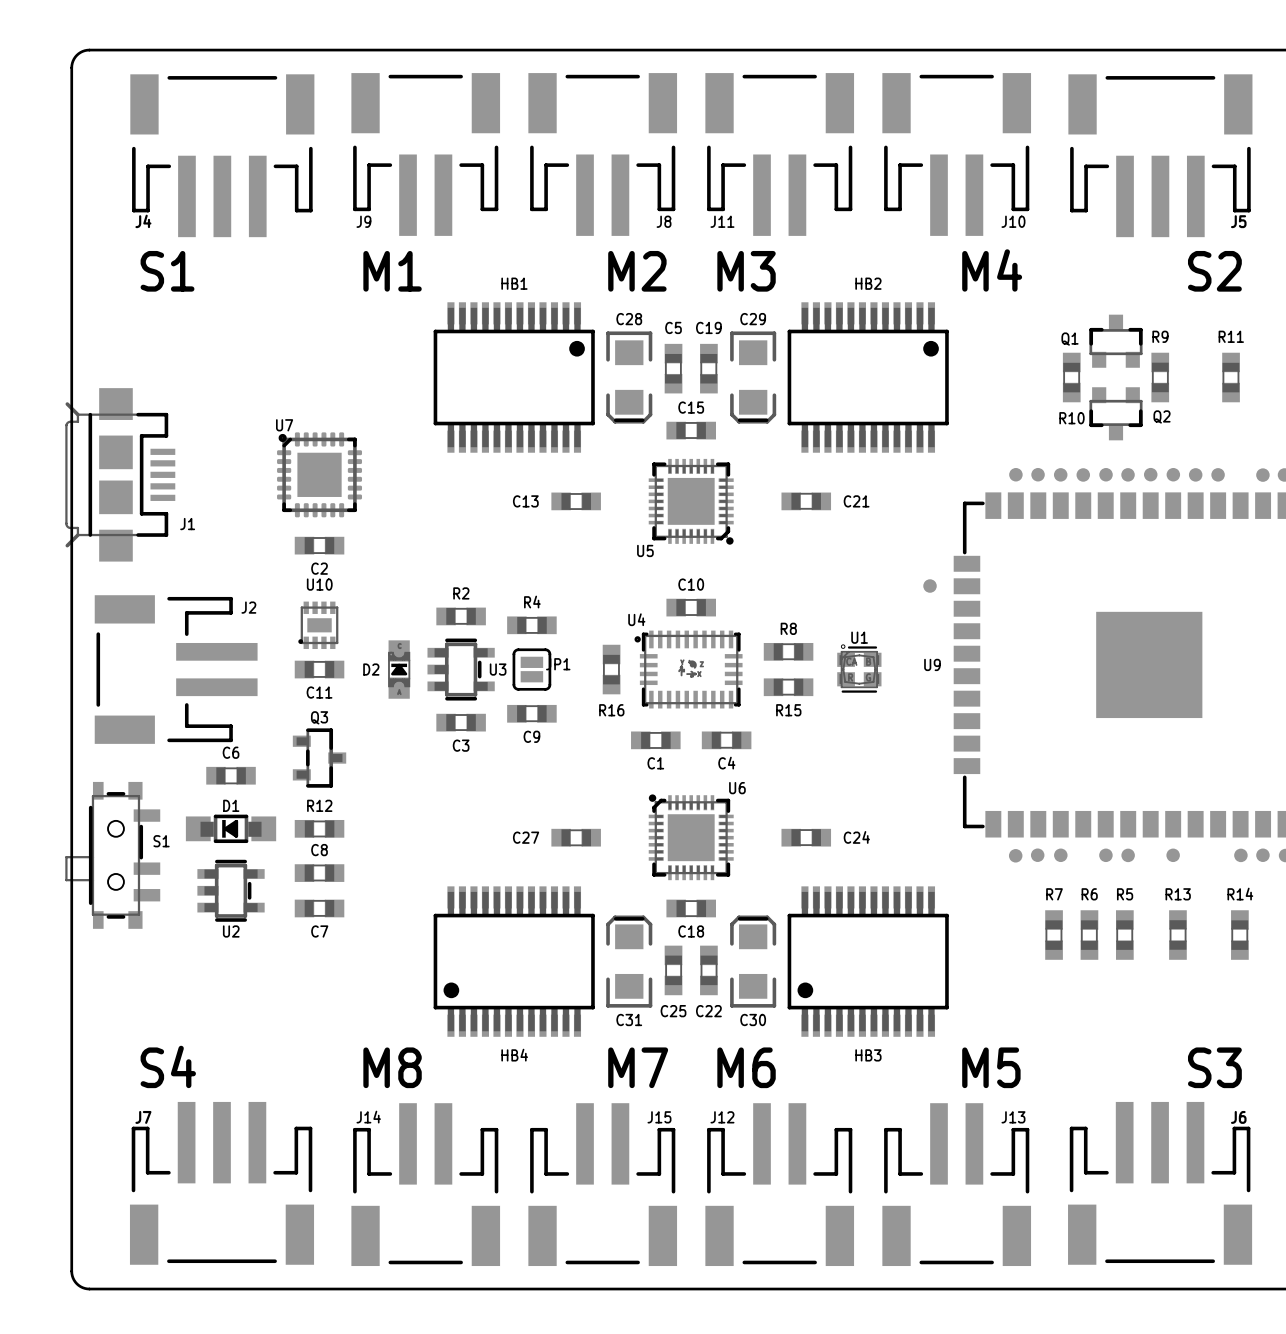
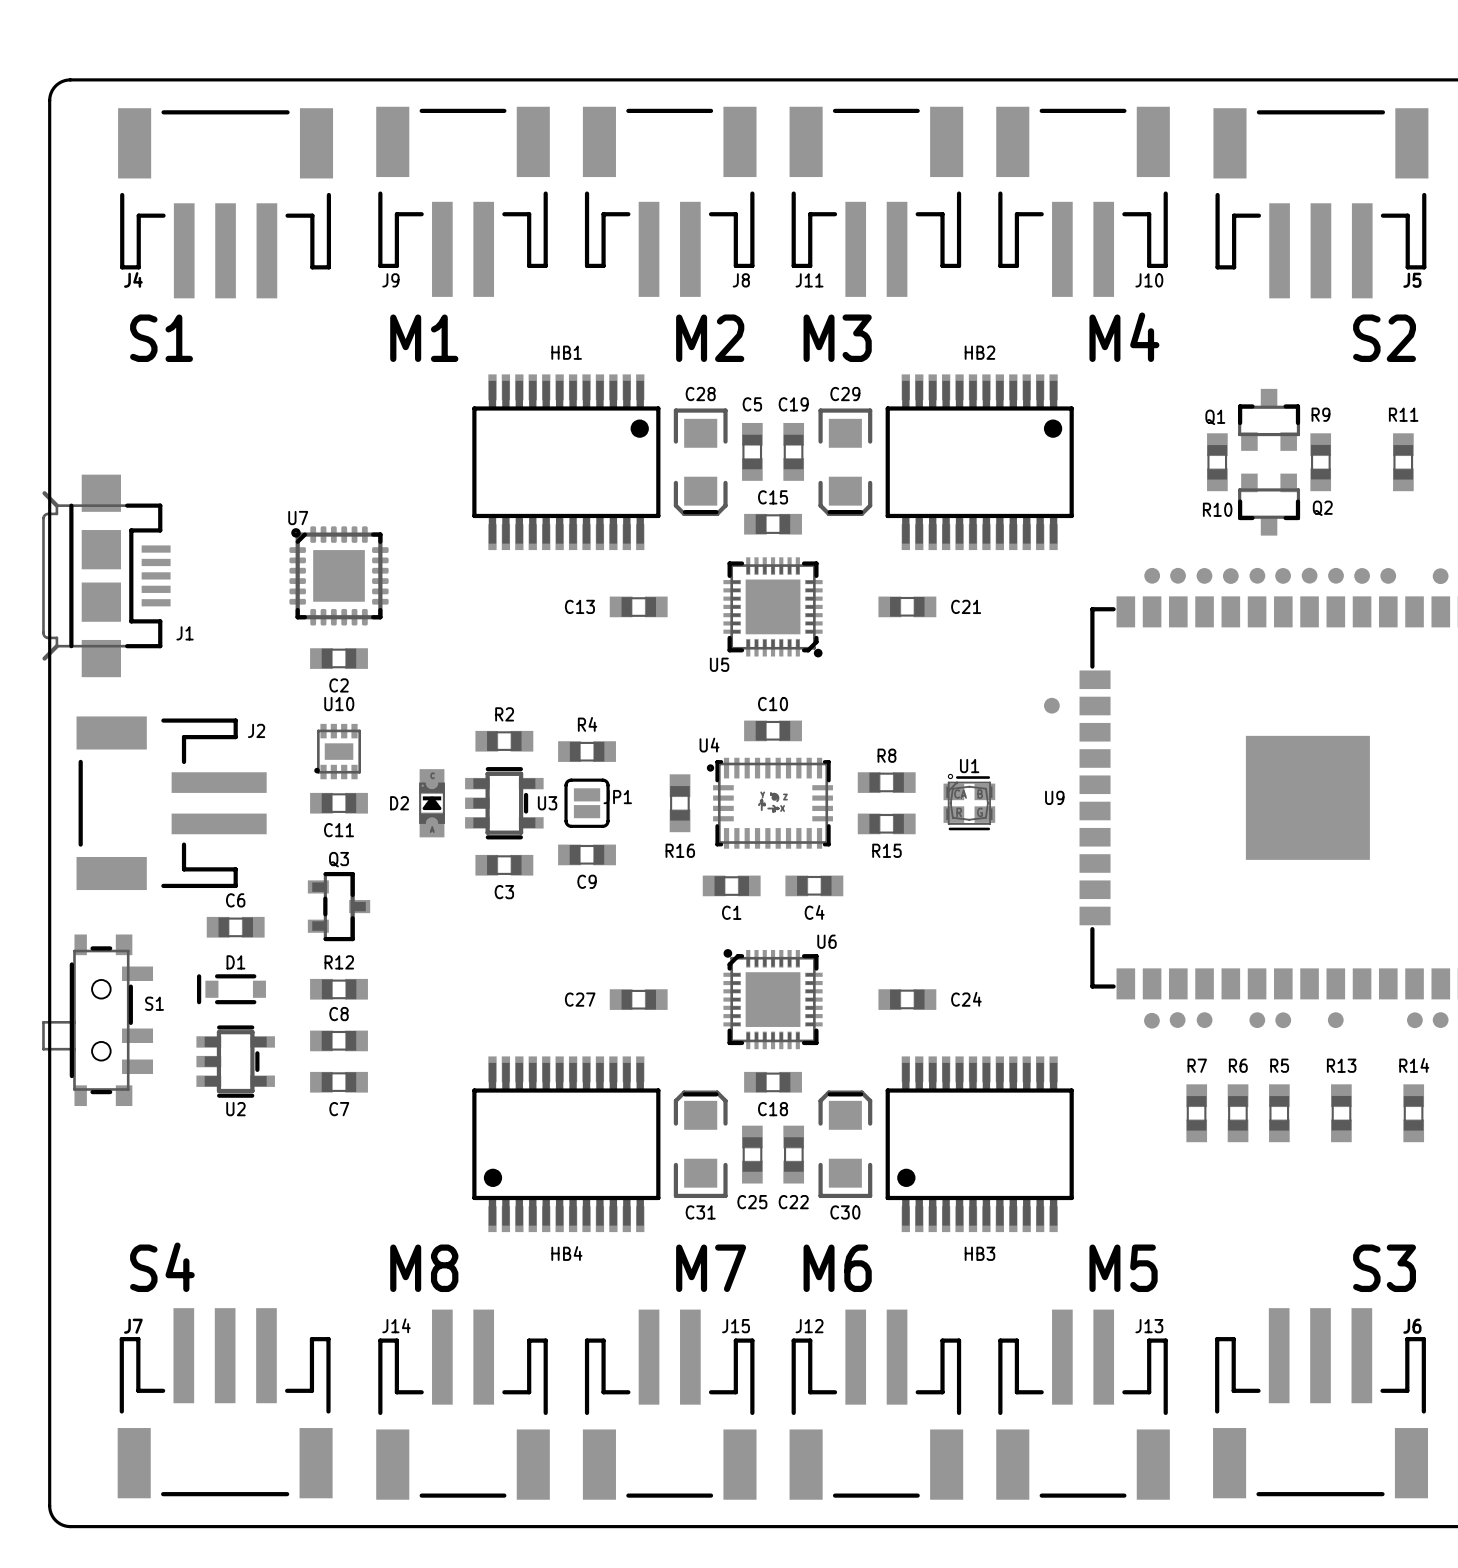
D1 footprint: [185, 814, 277, 844] -> [197, 974, 266, 1005]

